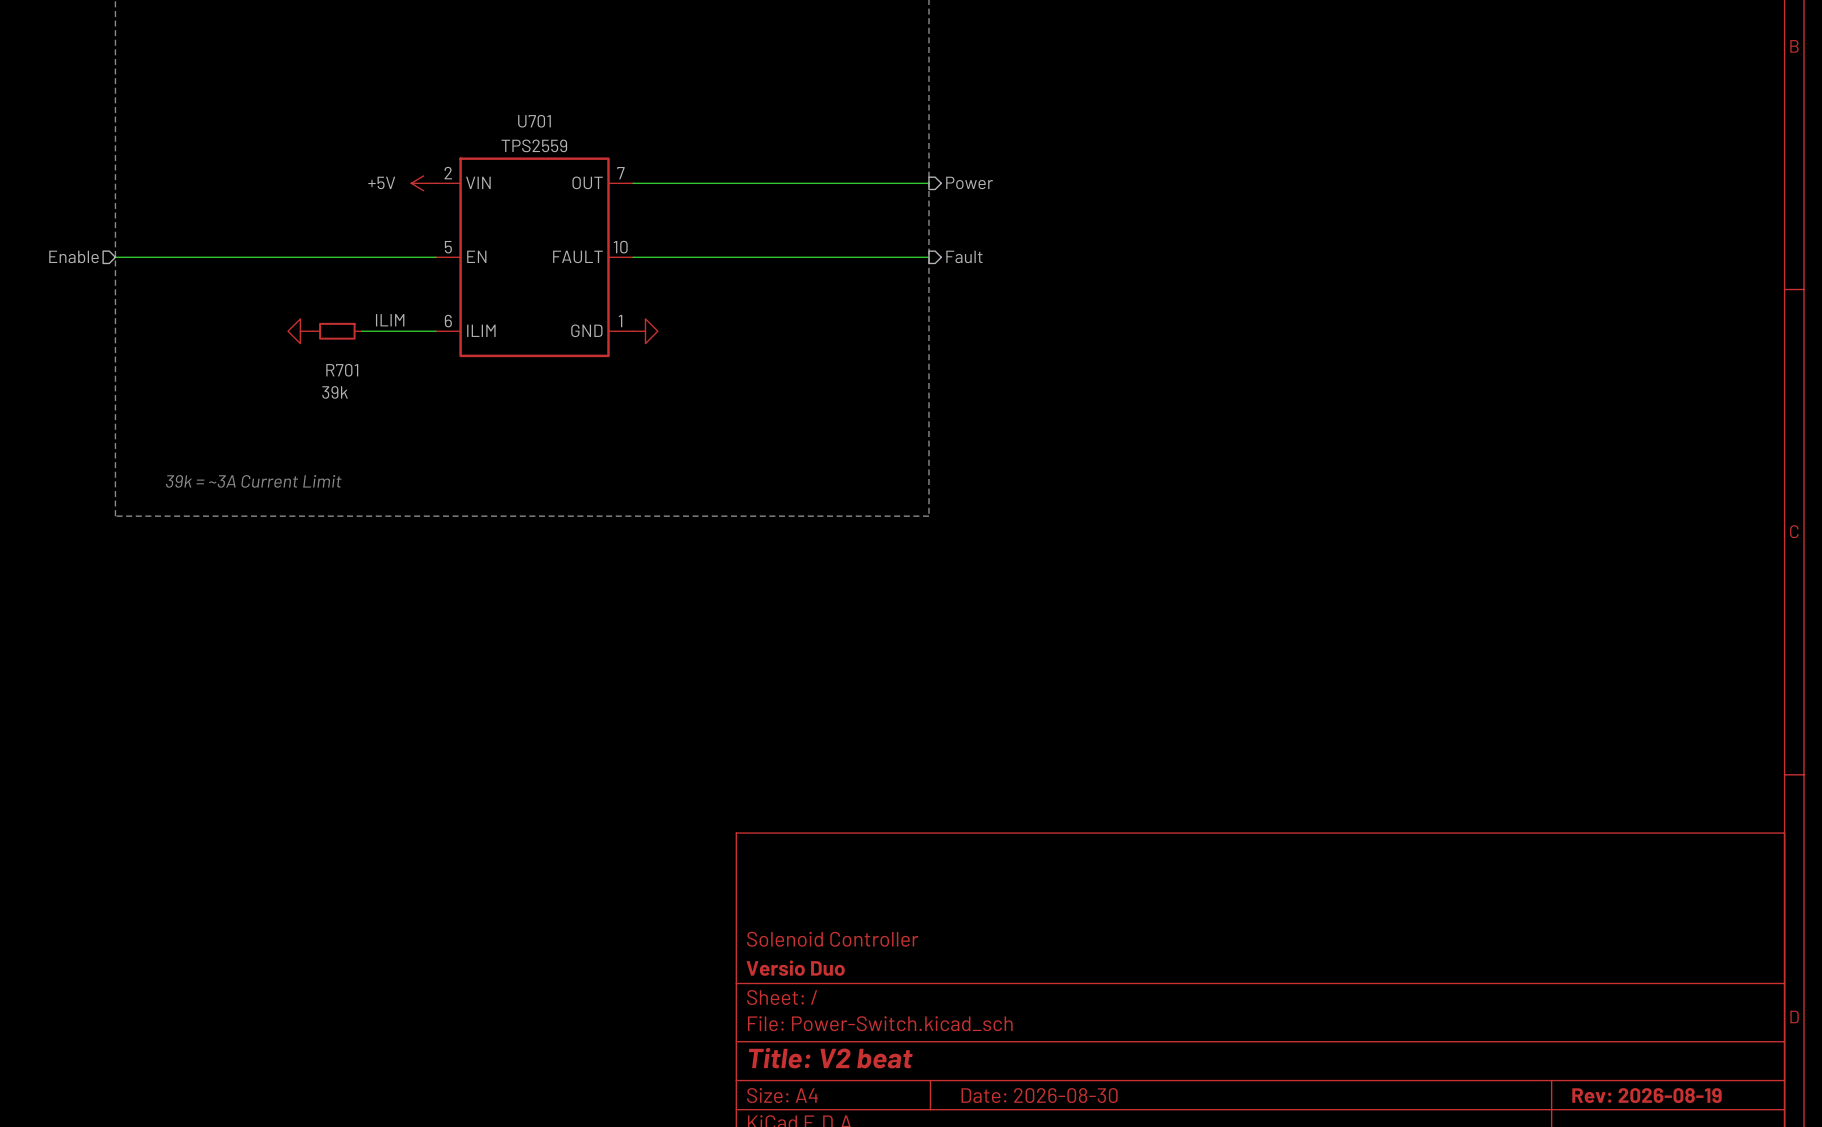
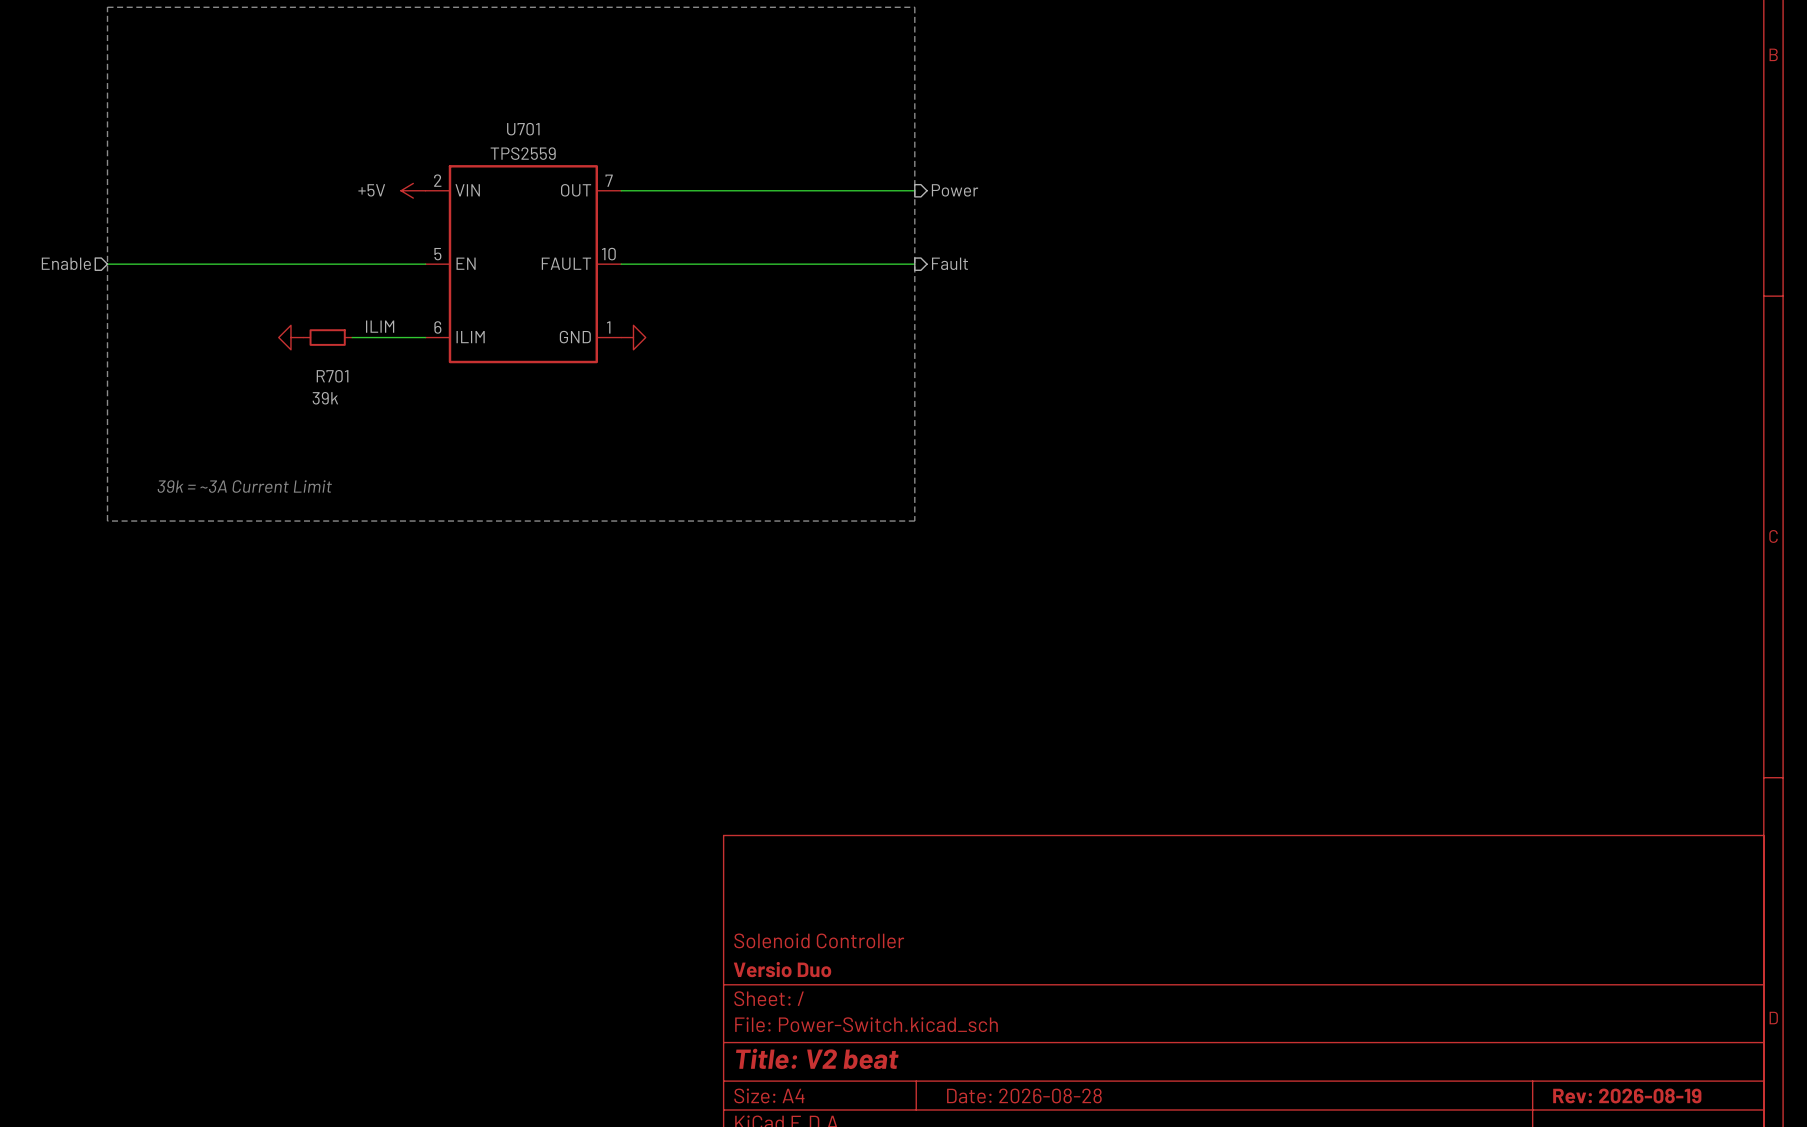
title block: Date: 2026-08-30 (1039, 1095) -> Date: 2026-08-28 (1024, 1095)

